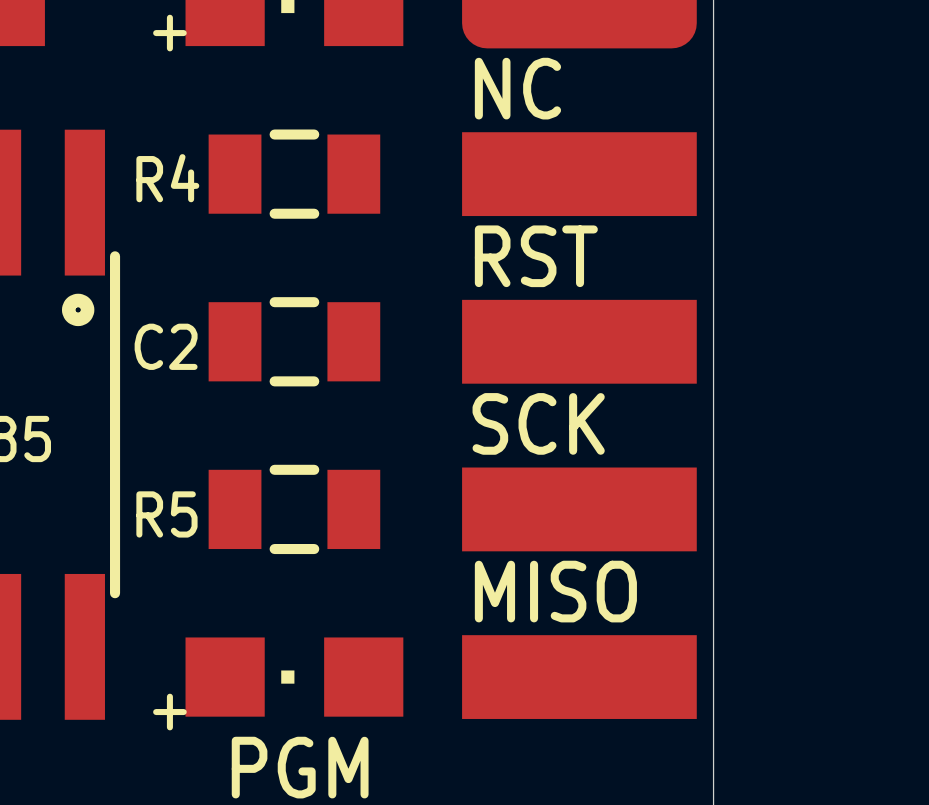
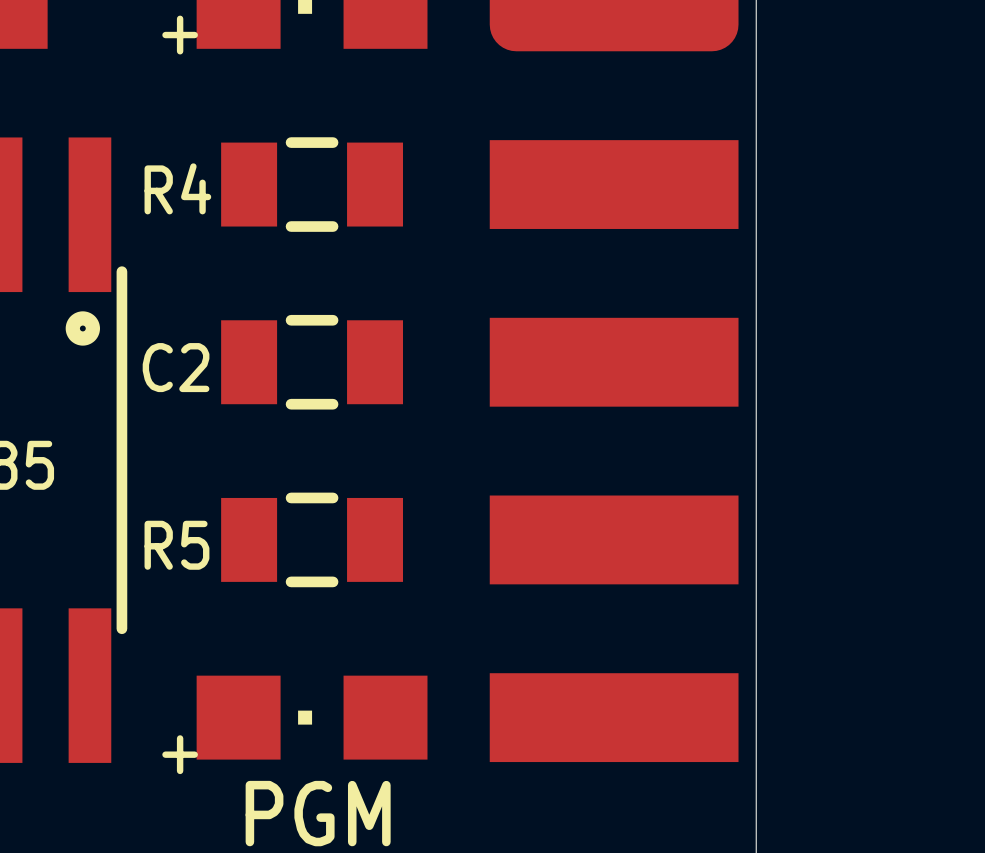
text: NC (517, 88) -> none
text: RST (536, 256) -> none
text: SCK (538, 423) -> none
text: MISO (555, 591) -> none

